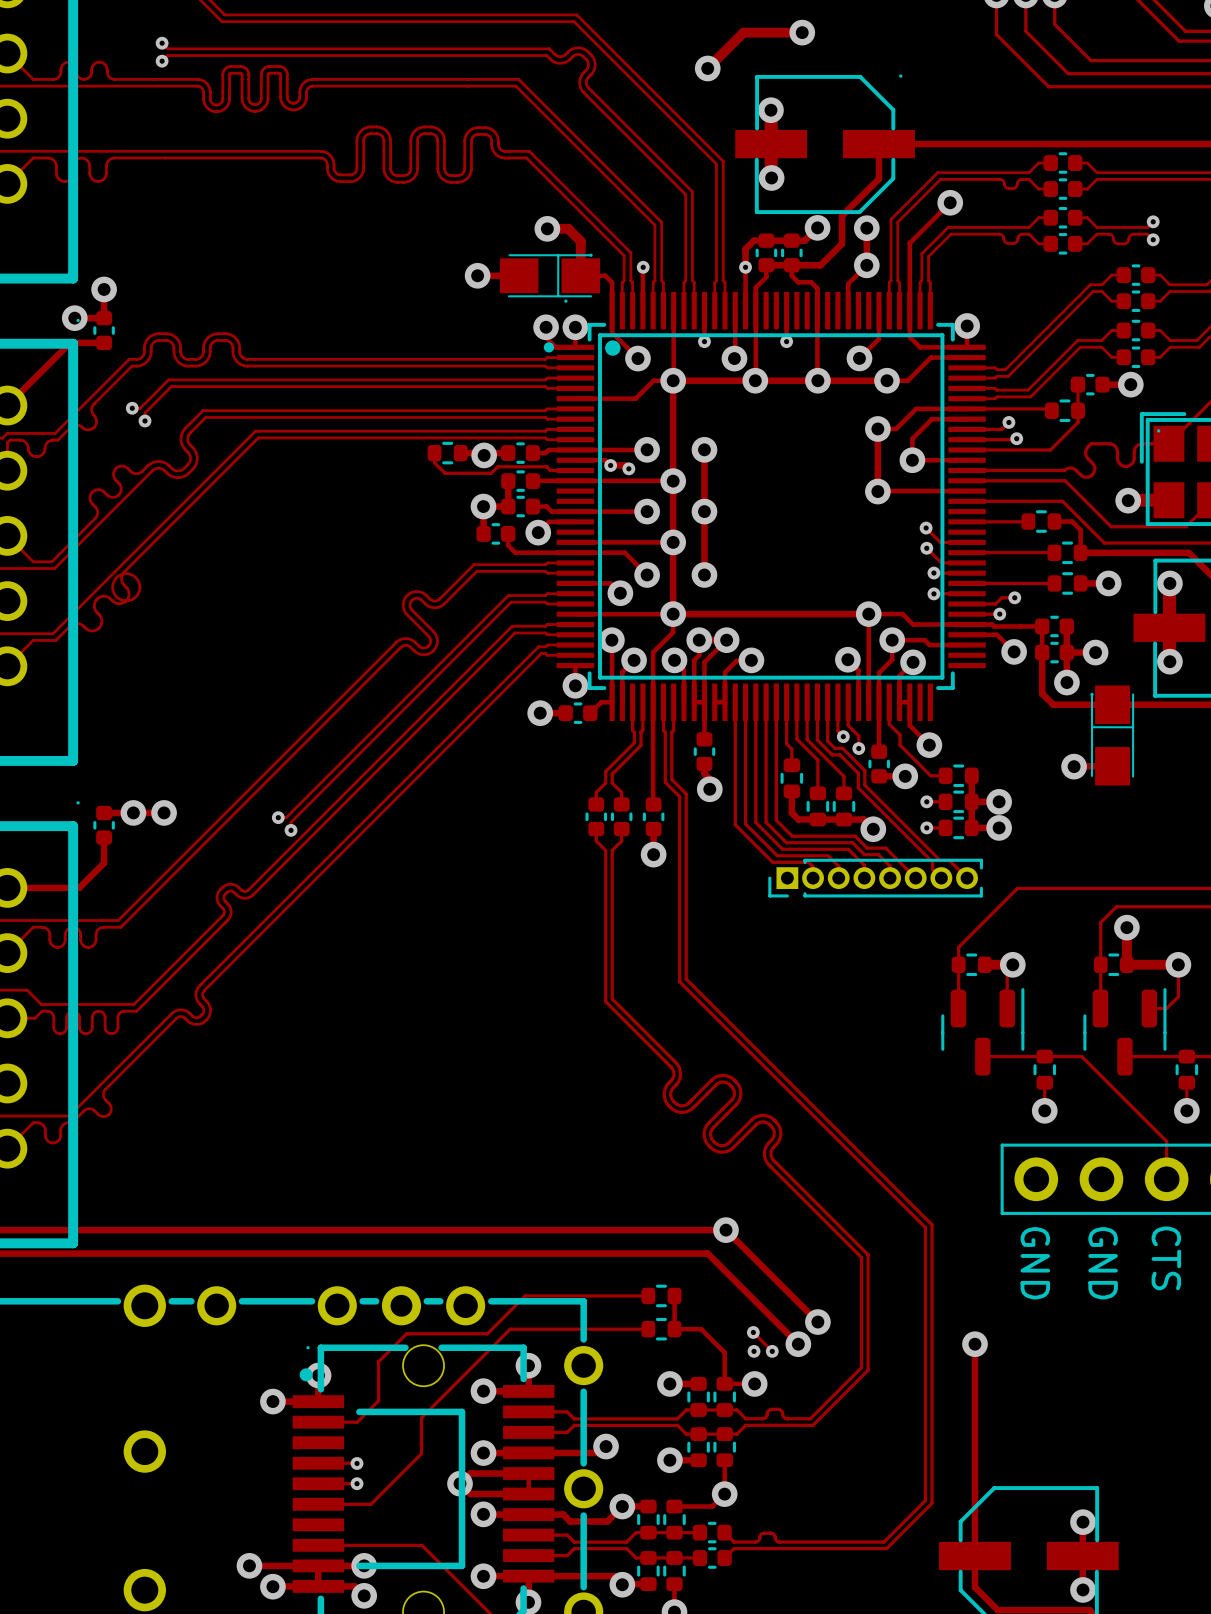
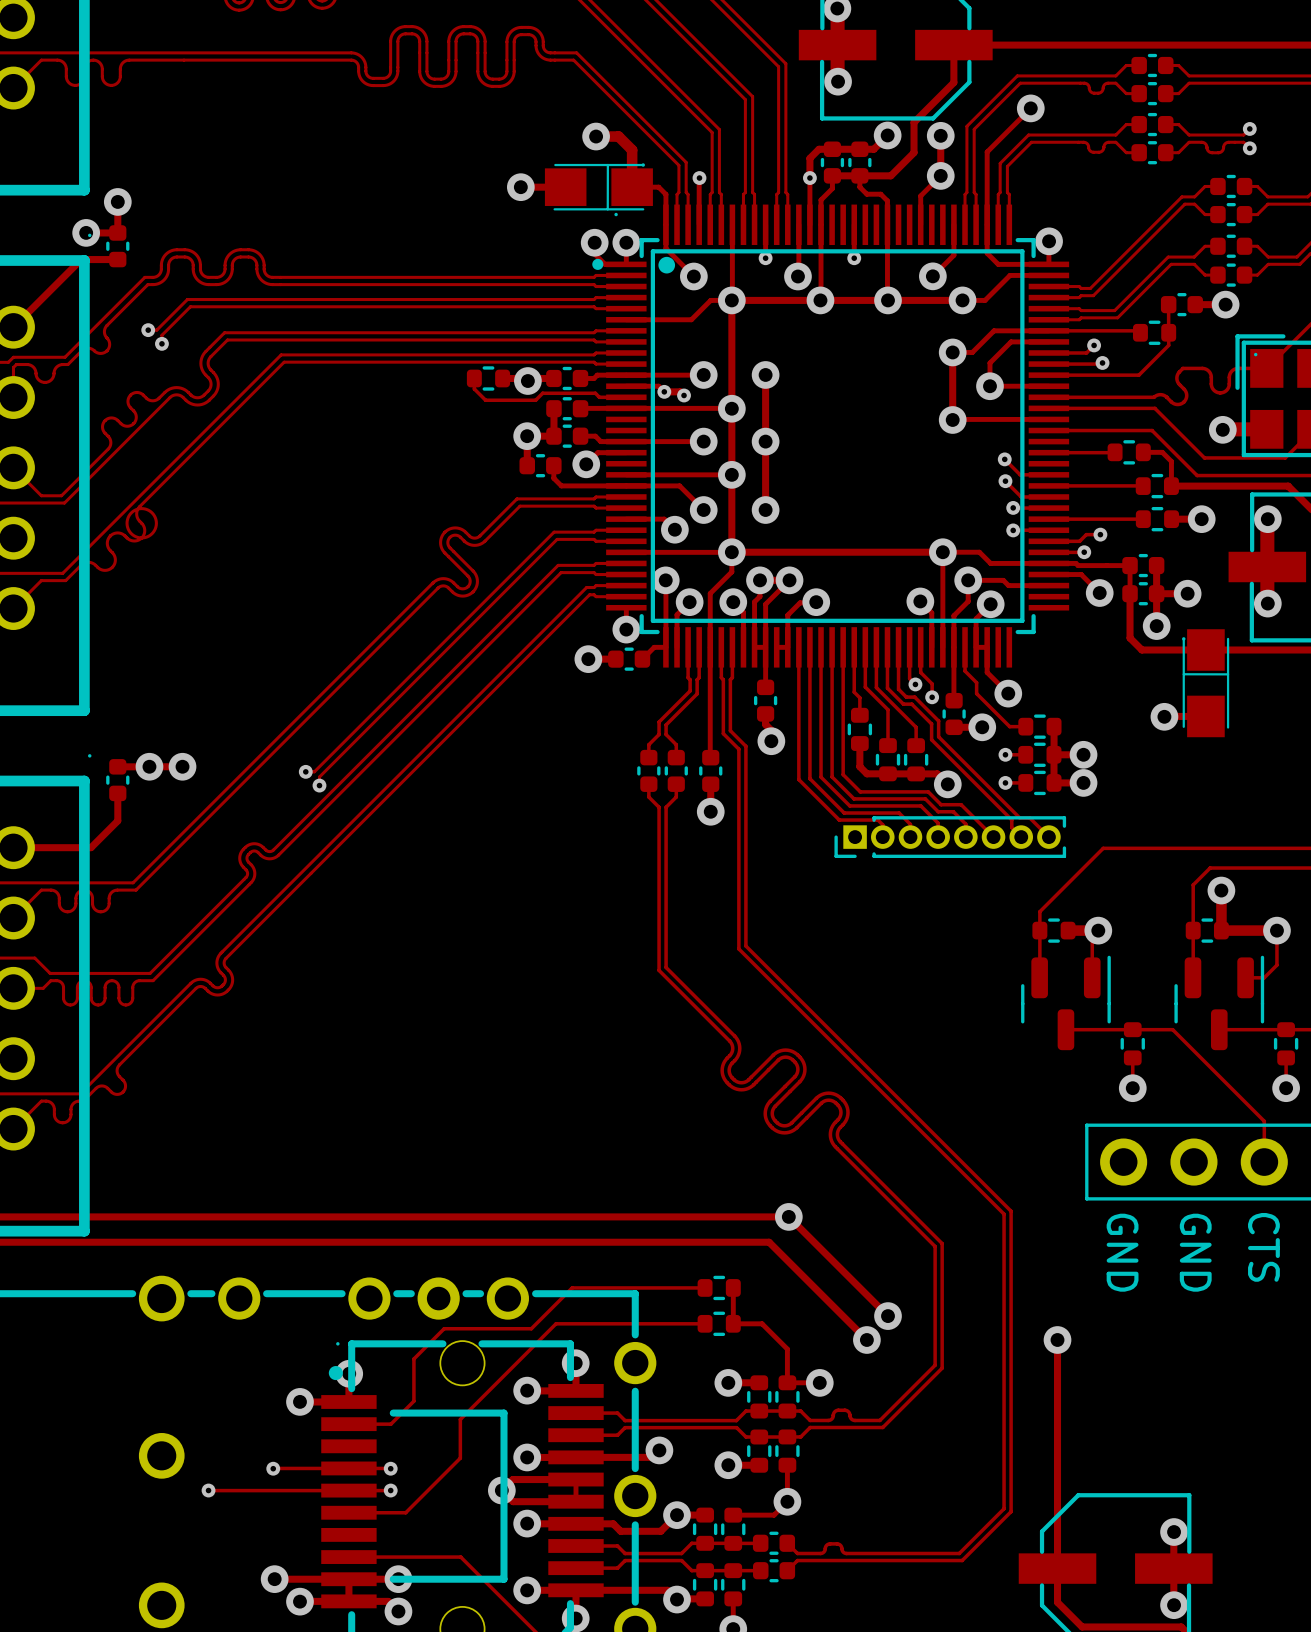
track: (753, 1332) (772, 1351) -> none
via: (753, 1332) -> none
via: (754, 1351) -> none
via: (772, 1351) -> none
track: none -> (273, 1468) (348, 1468)
via: none -> (273, 1468)
track: none -> (208, 1490) (348, 1490)
via: none -> (208, 1490)

